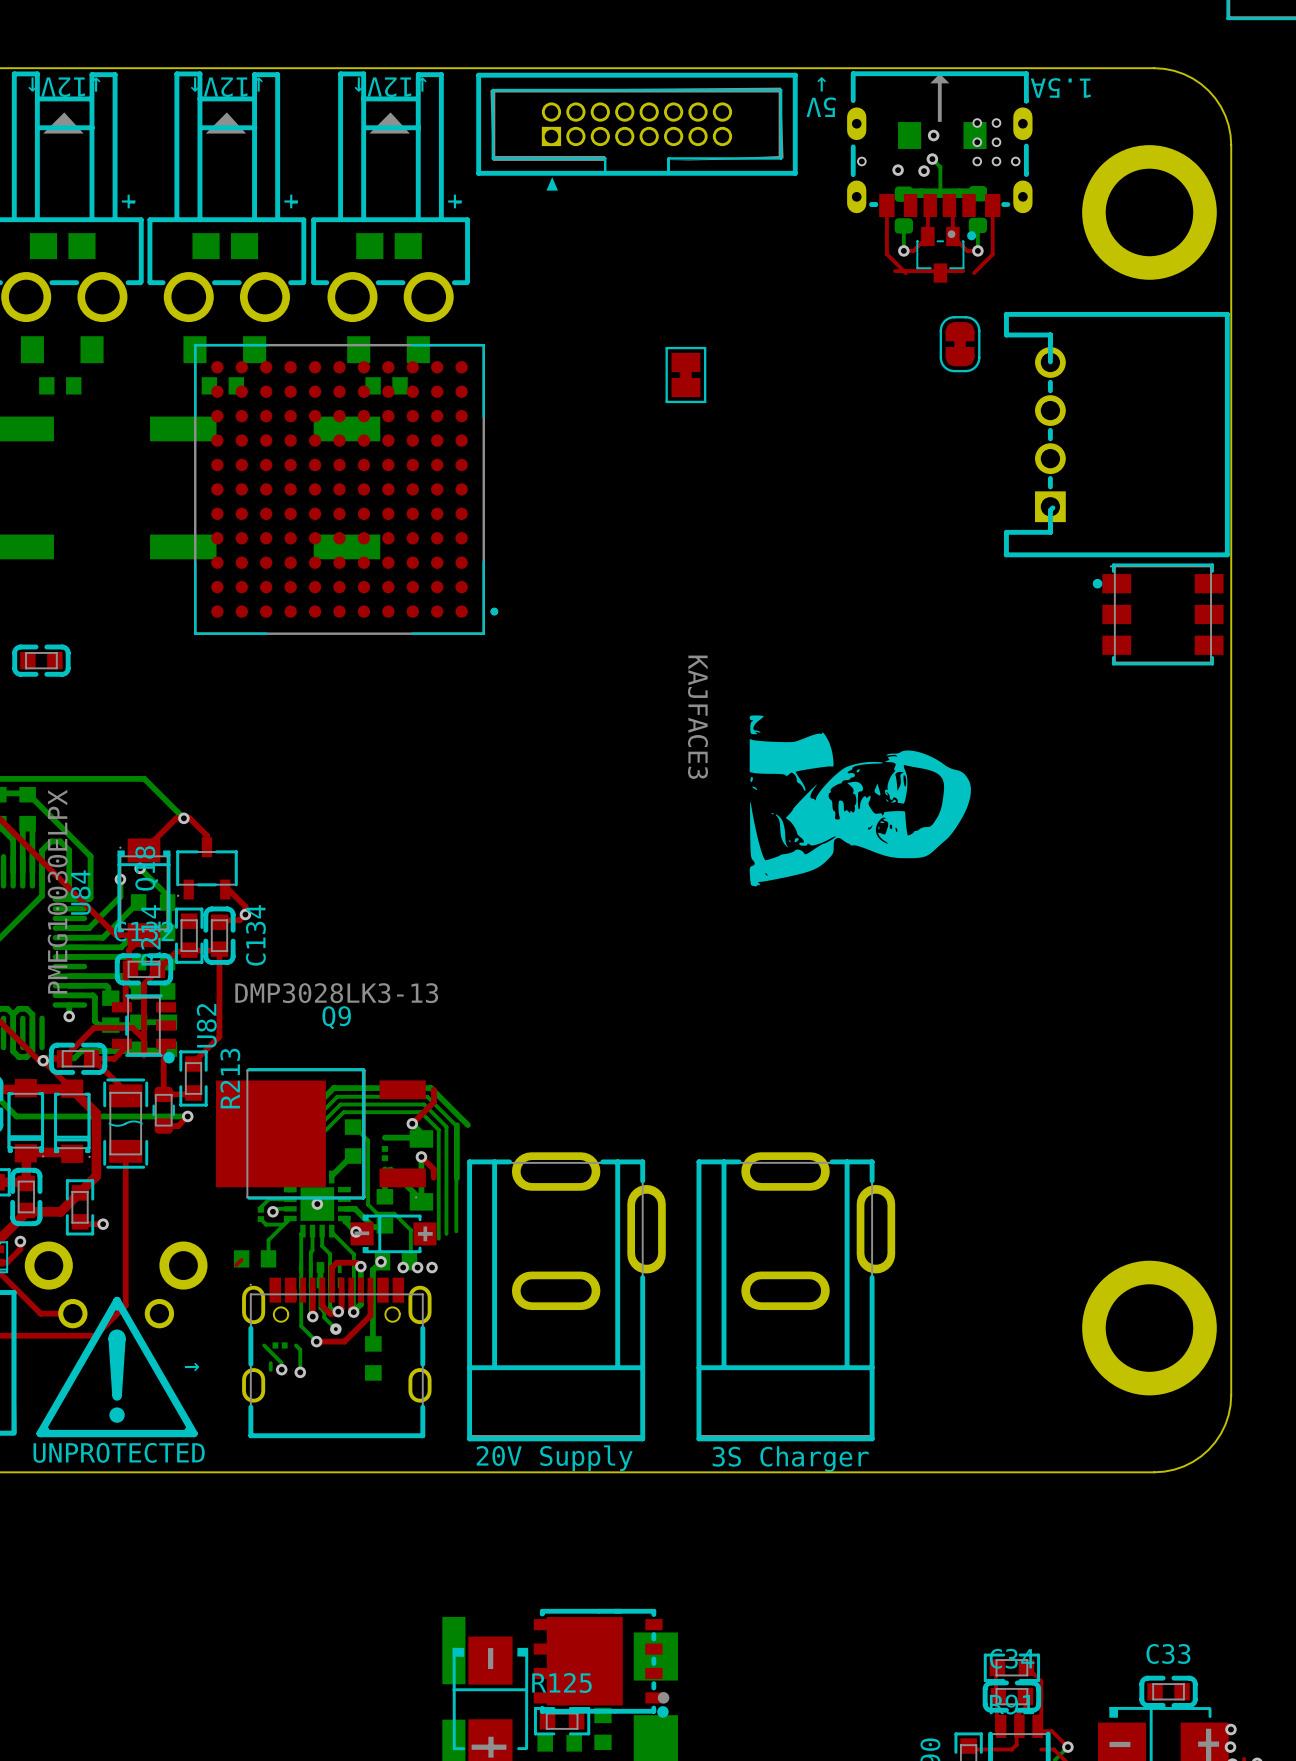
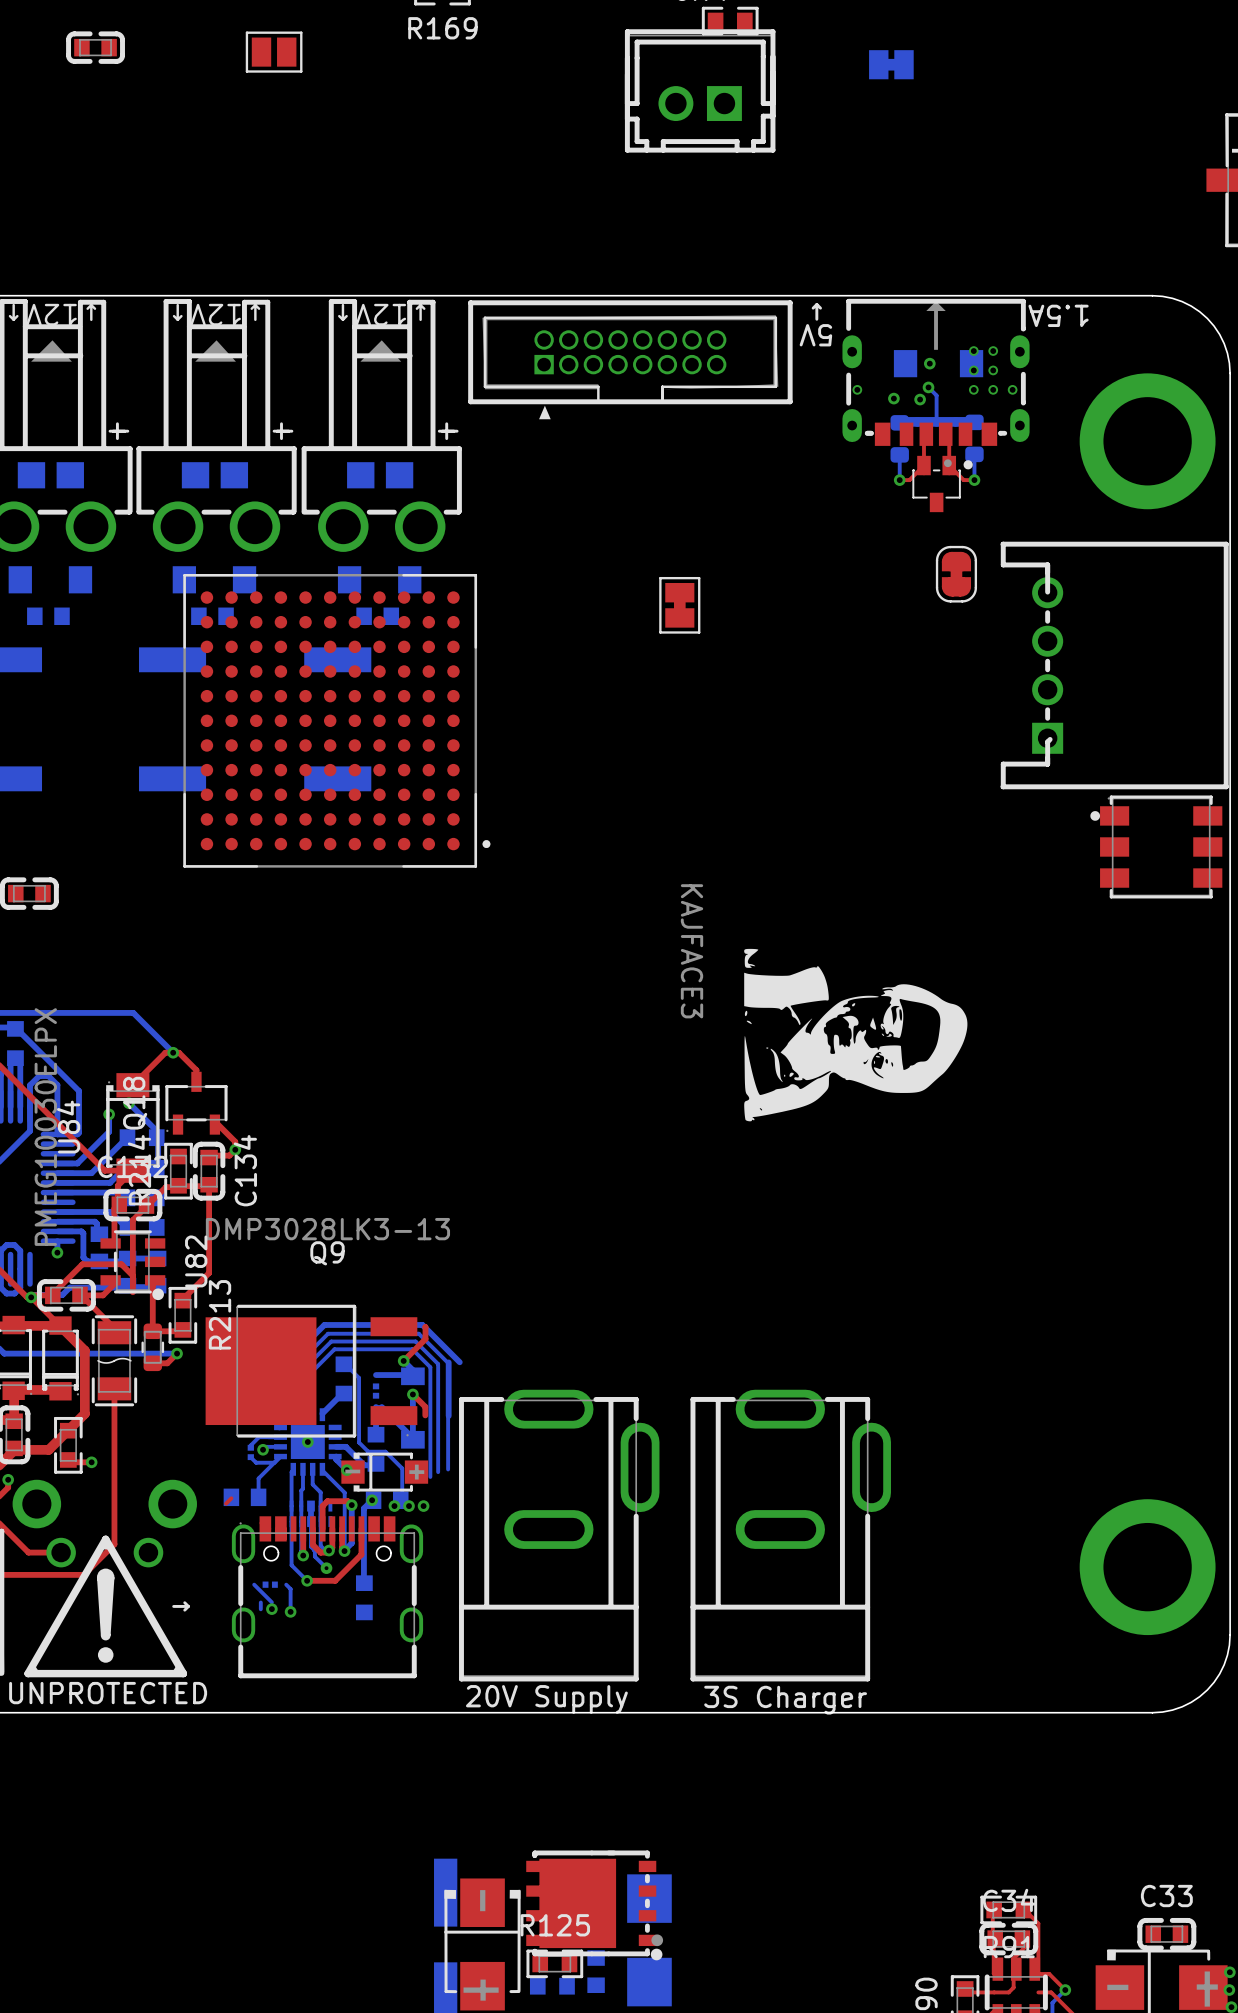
top track: (886, 205) (886, 254) (905, 273) -> none
top track: (992, 205) (992, 254) (974, 273) -> none
top track: (895, 271) (963, 271) -> none

